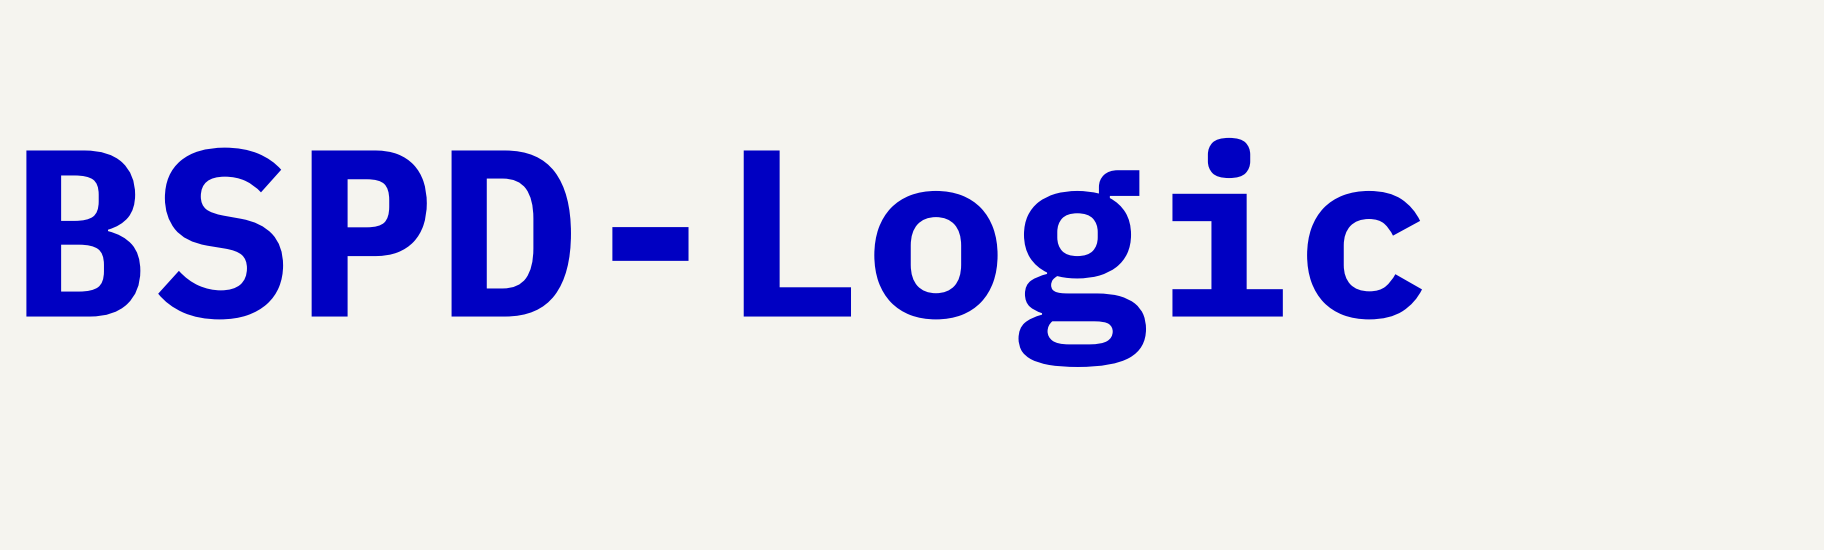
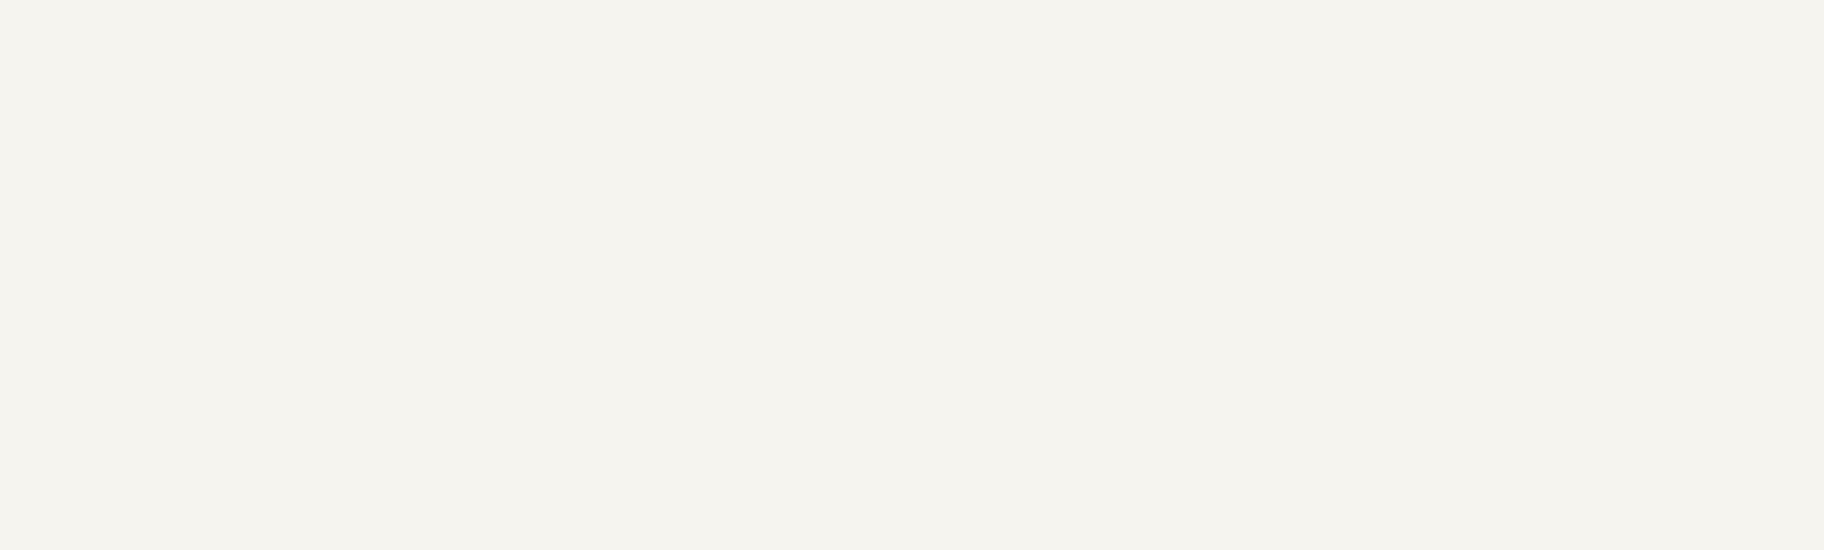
text: BSPD-Logic (724, 252) -> none

